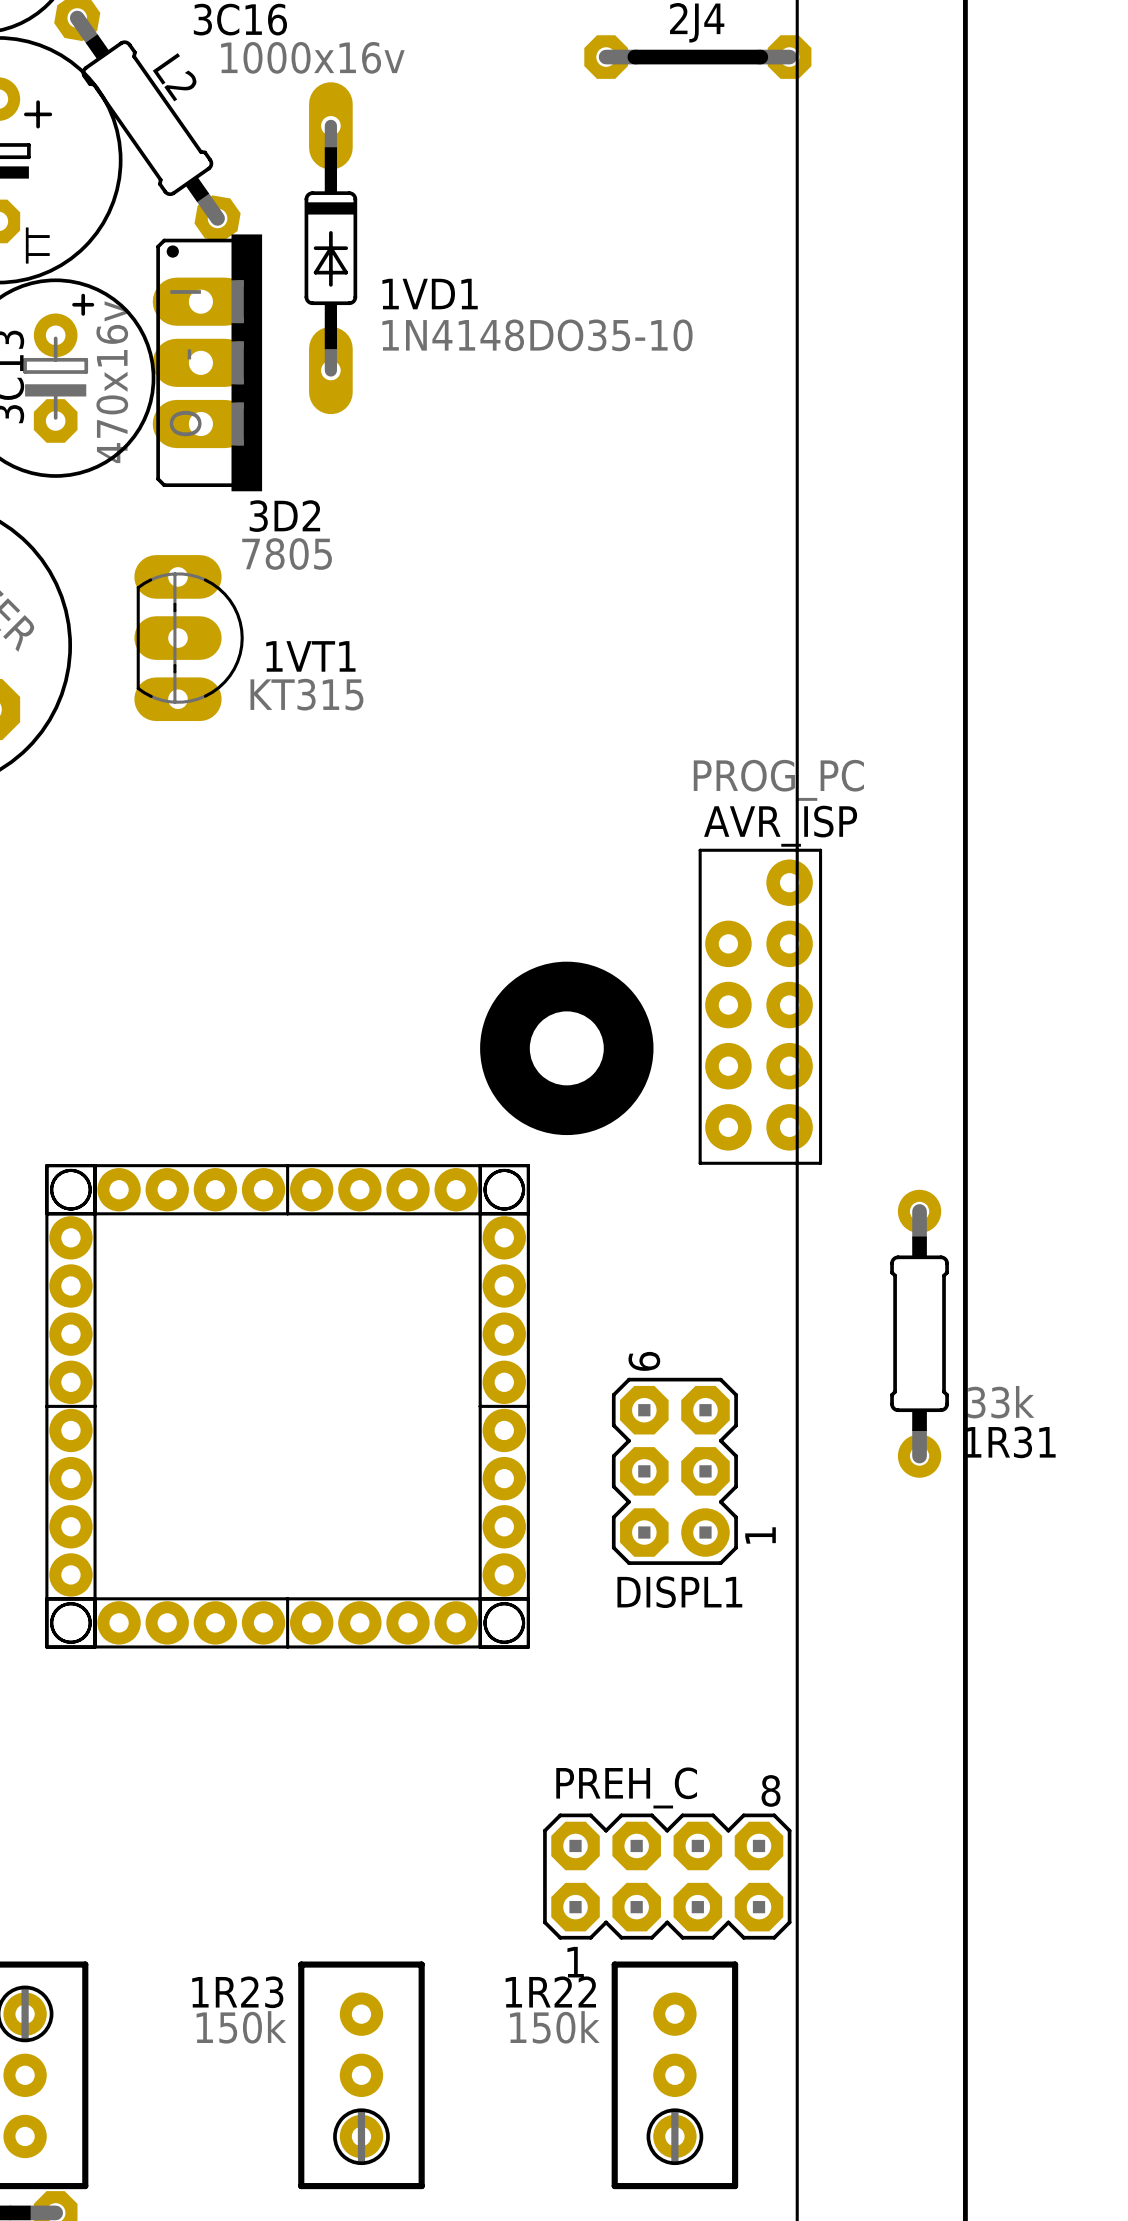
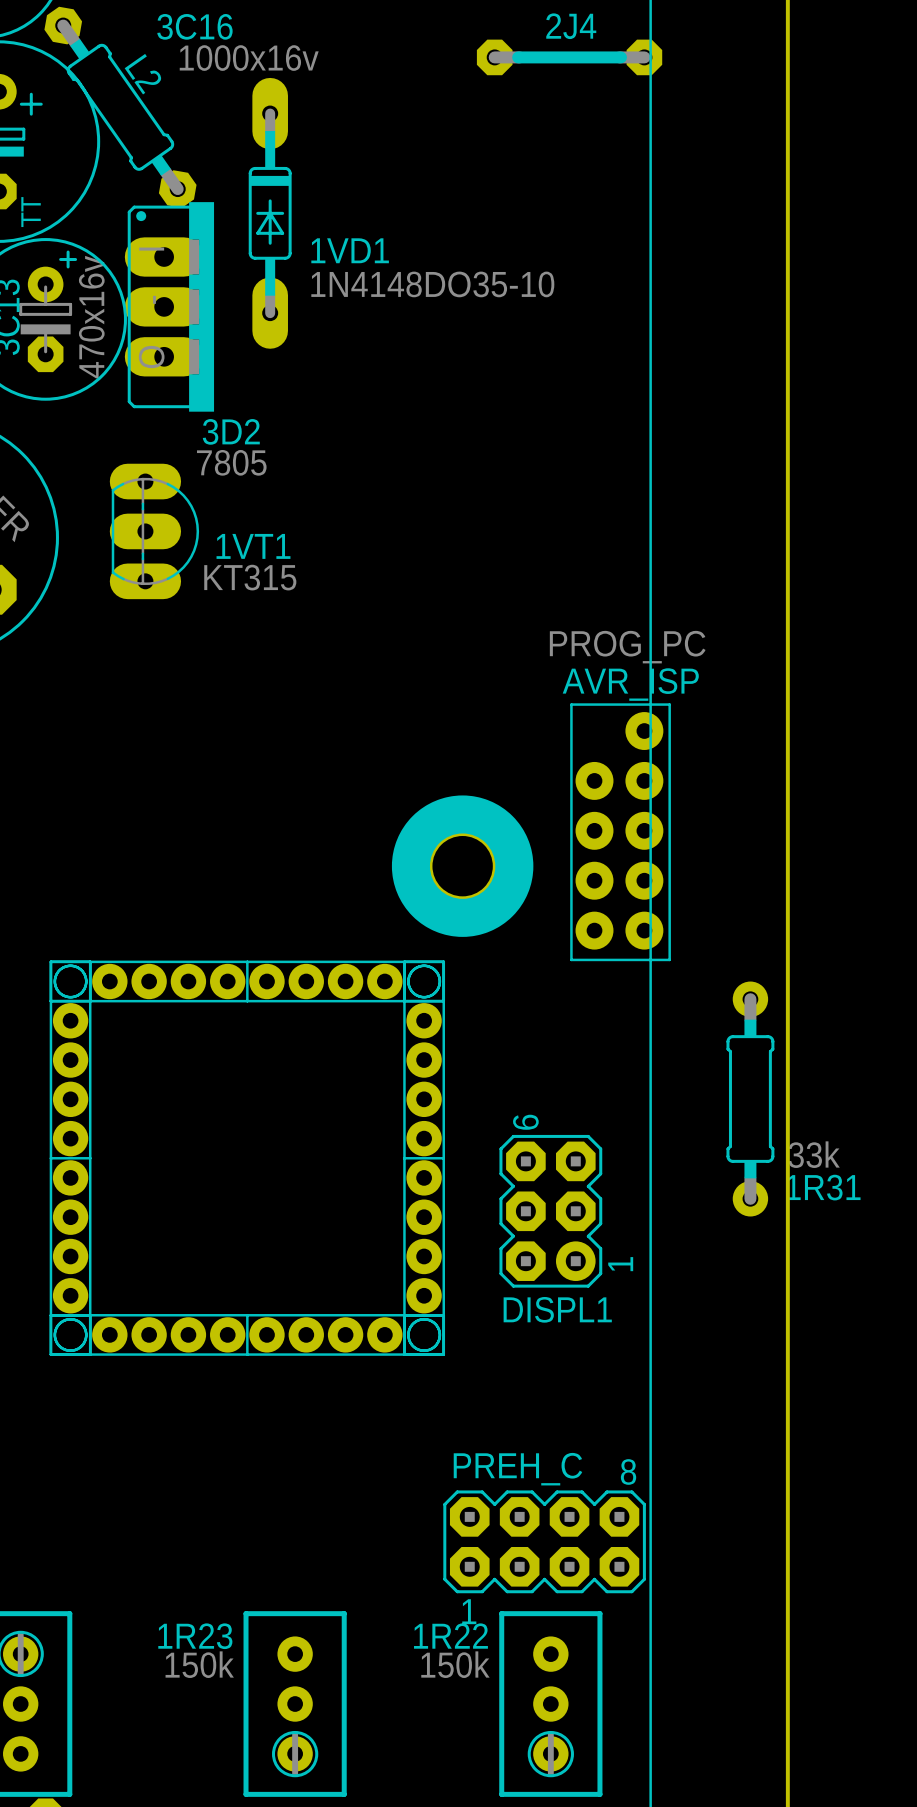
part position: (287, 1189) -> (247, 981)
part position: (70, 1406) -> (70, 1158)
part position: (504, 1406) -> (424, 1158)
part position: (287, 1622) -> (247, 1334)

